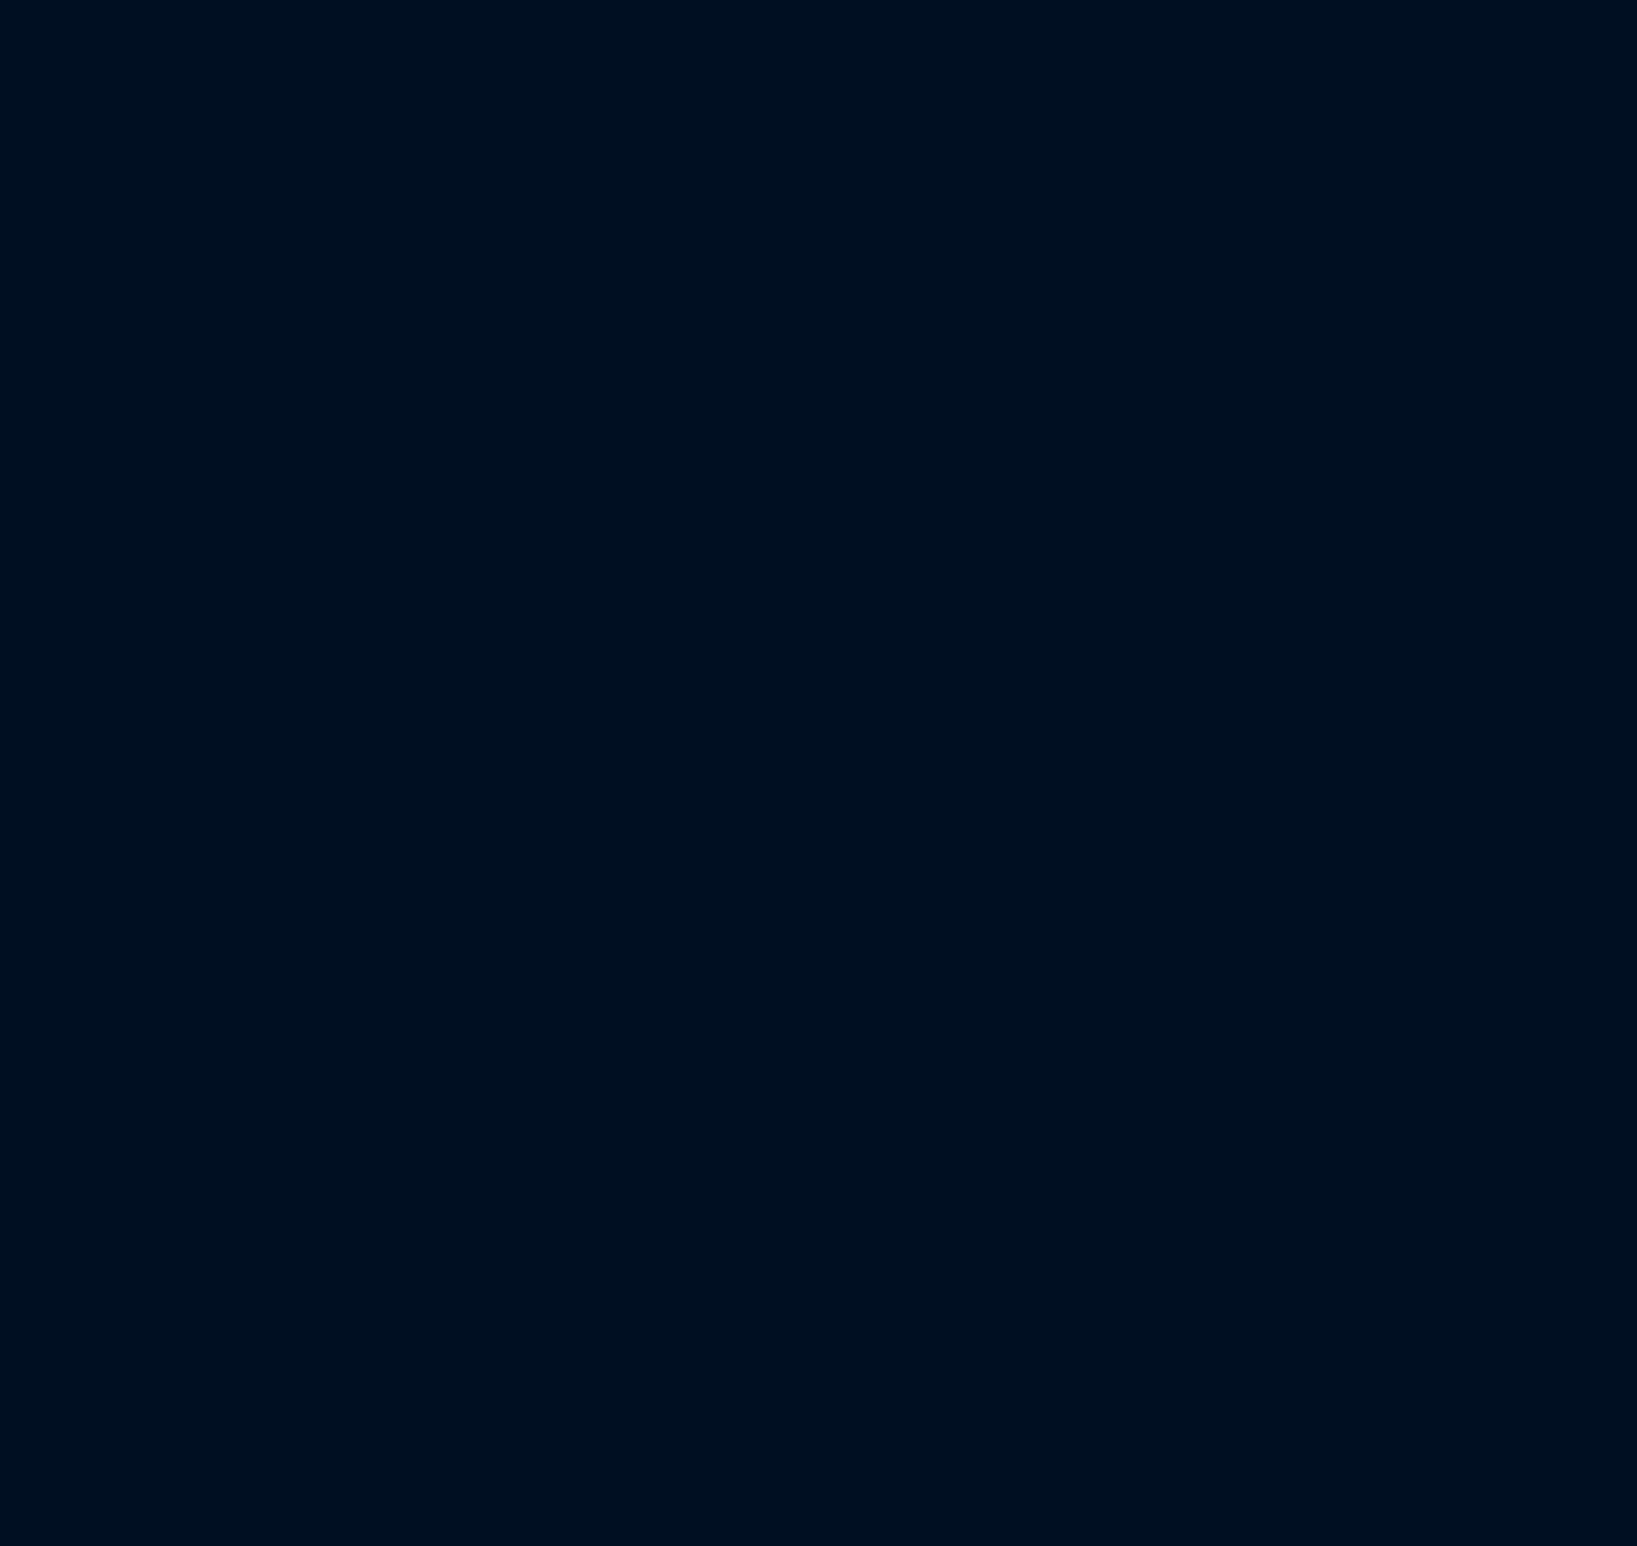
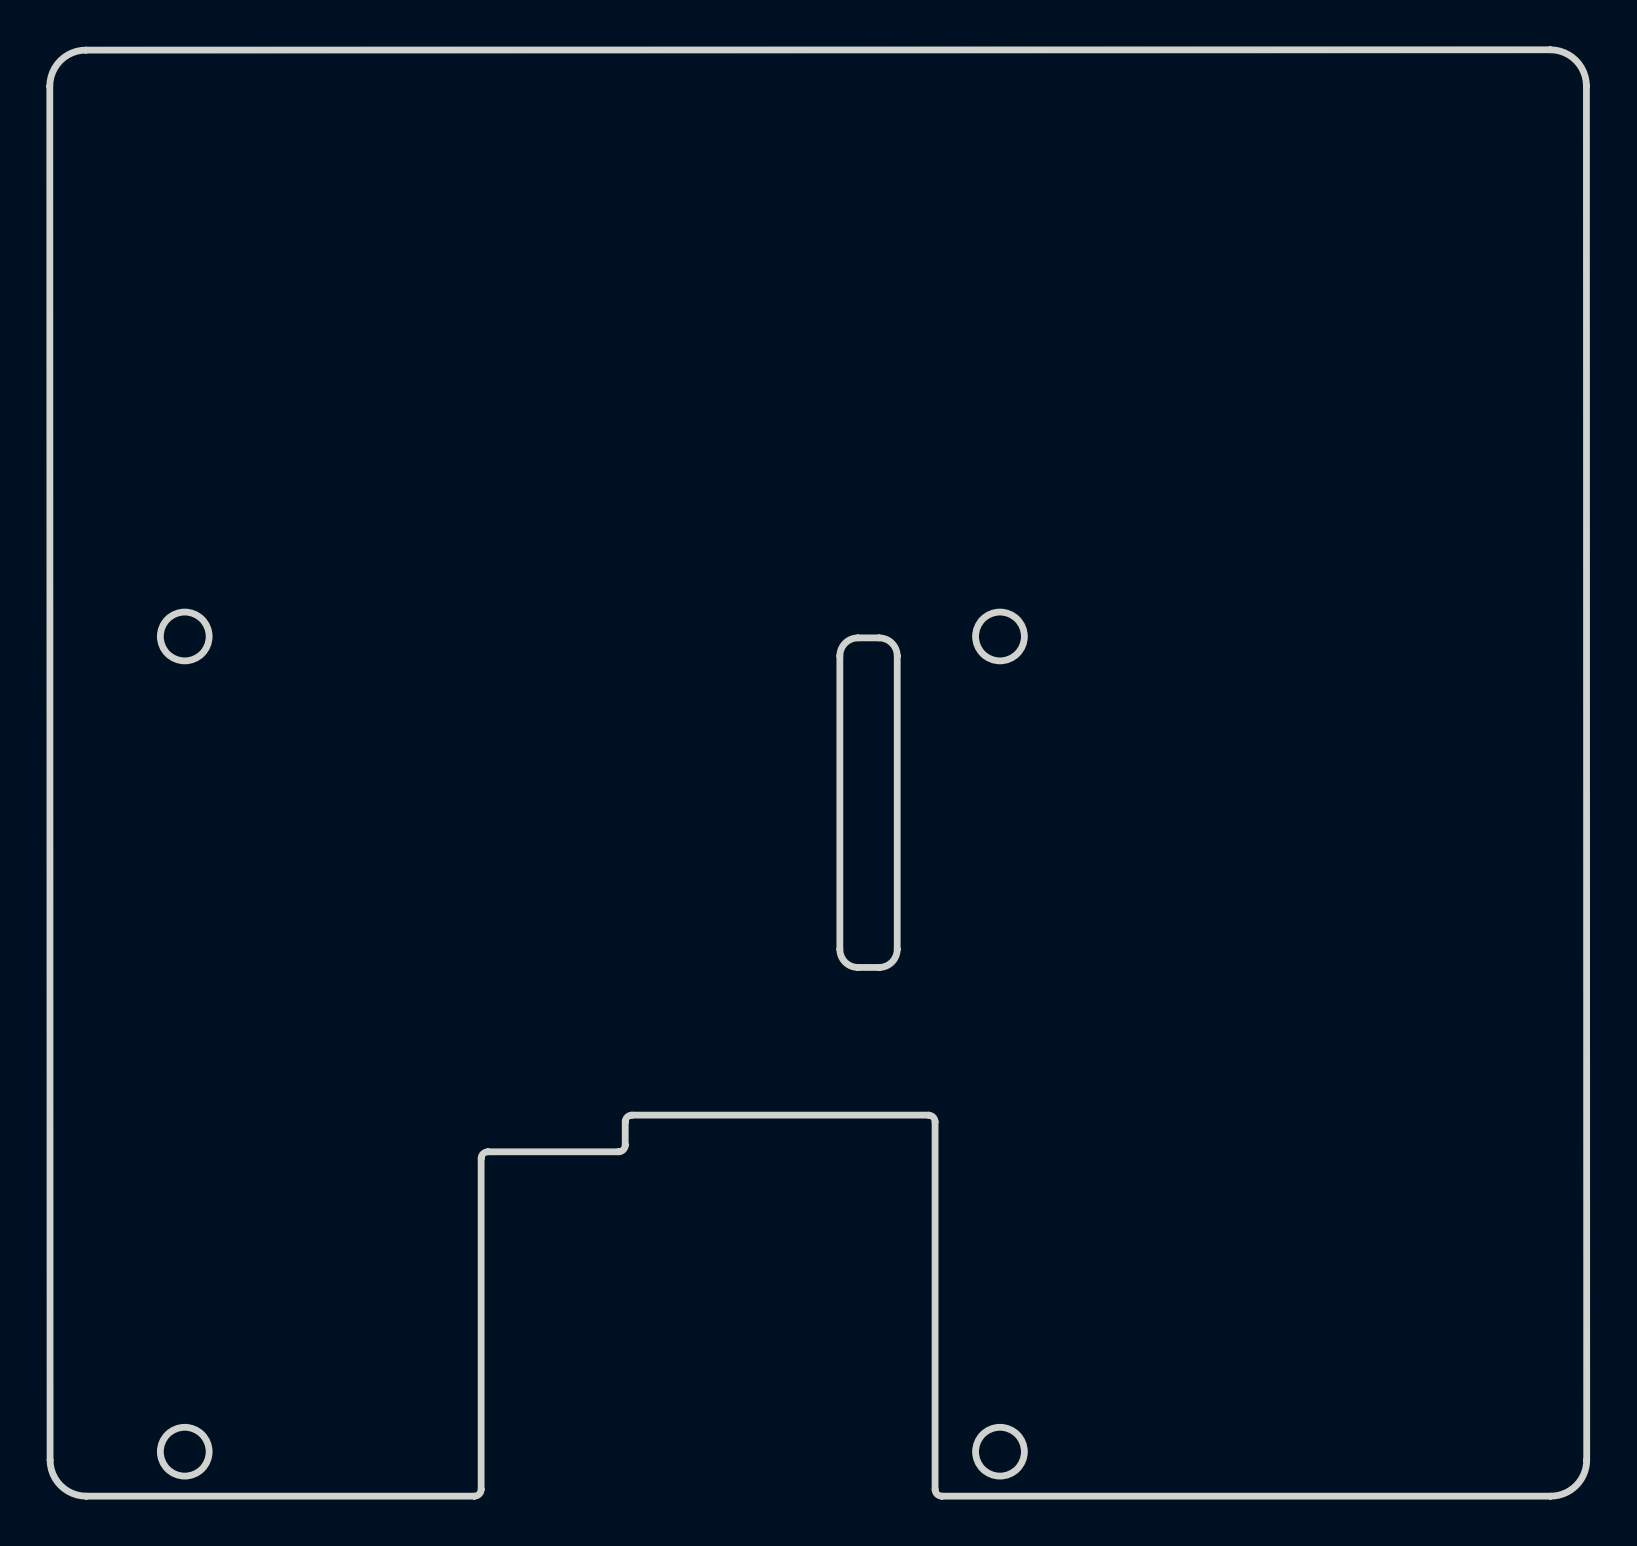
board edge: none -> (1550, 49) (85, 50) (72, 52) (60, 60) (52, 72) (49, 86) (50, 1460) (52, 1473) (60, 1485) (72, 1493) (86, 1496) (477, 1495) (481, 1489) (481, 1156) (487, 1151) (620, 1151) (625, 1145) (625, 1119) (632, 1115) (928, 1115) (933, 1117) (935, 1489) (939, 1495) (1550, 1496) (1566, 1492) (1576, 1485) (1584, 1471) (1586, 1459) (1586, 85) (1583, 72) (1575, 60) (1564, 52) (1550, 49)
round board edge: none -> [156, 608, 213, 665]
round board edge: none -> [972, 608, 1028, 665]
board edge: none -> (879, 637) (851, 638) (843, 644) (839, 653) (839, 949) (845, 962) (855, 967) (886, 966) (893, 960) (897, 951) (897, 655) (891, 643) (879, 637)
round board edge: none -> [156, 1423, 213, 1480]
round board edge: none -> [972, 1423, 1028, 1480]

